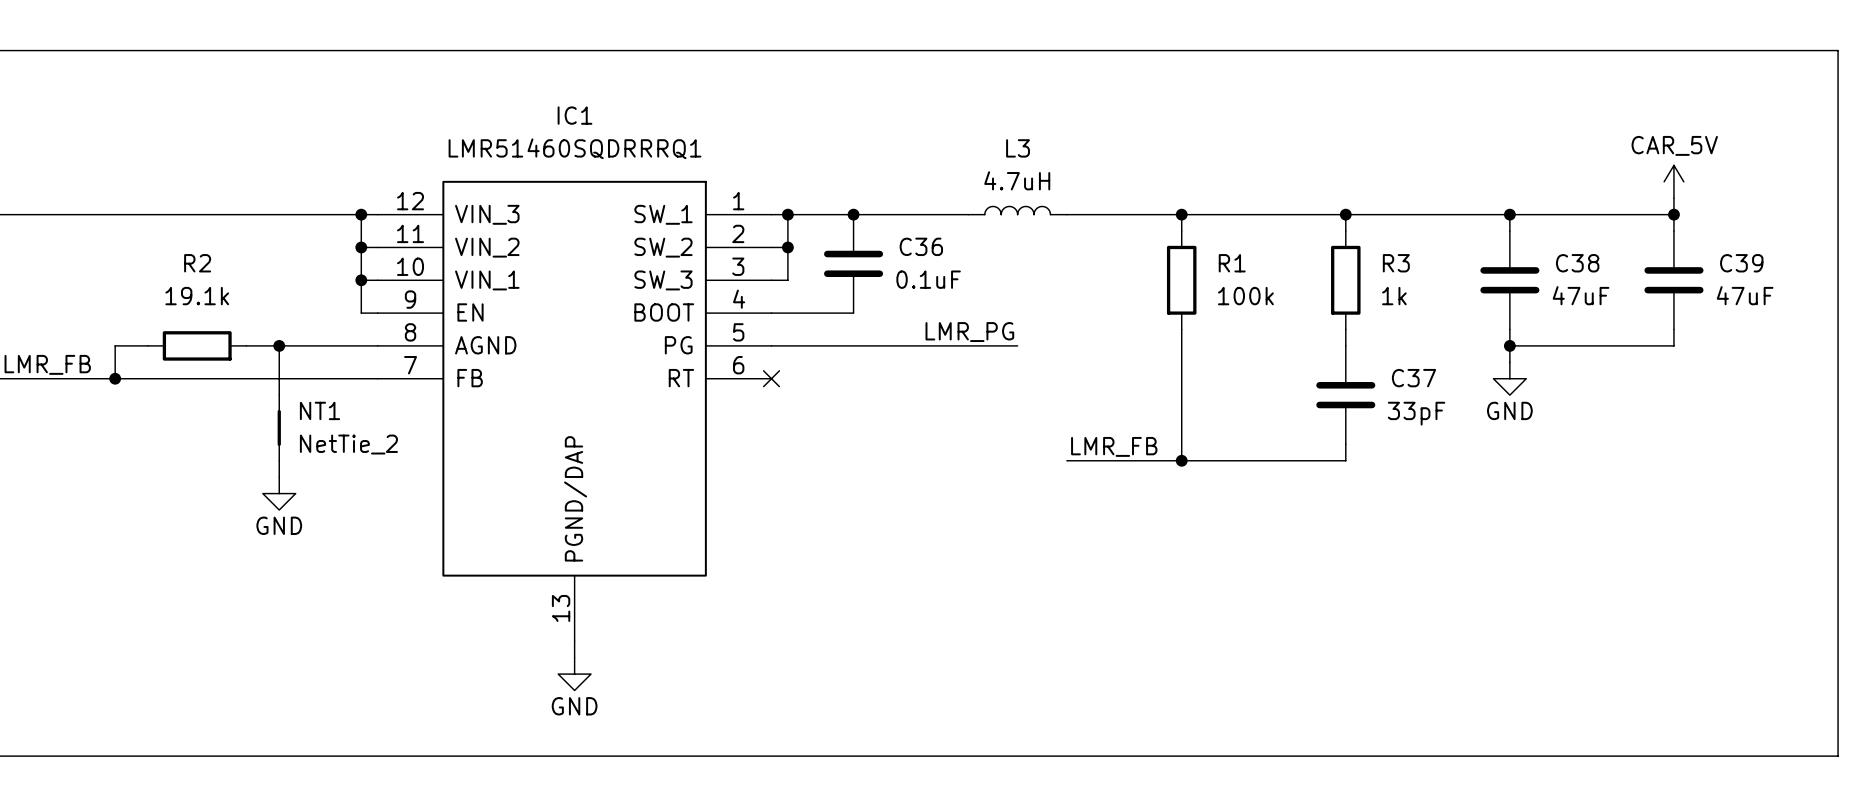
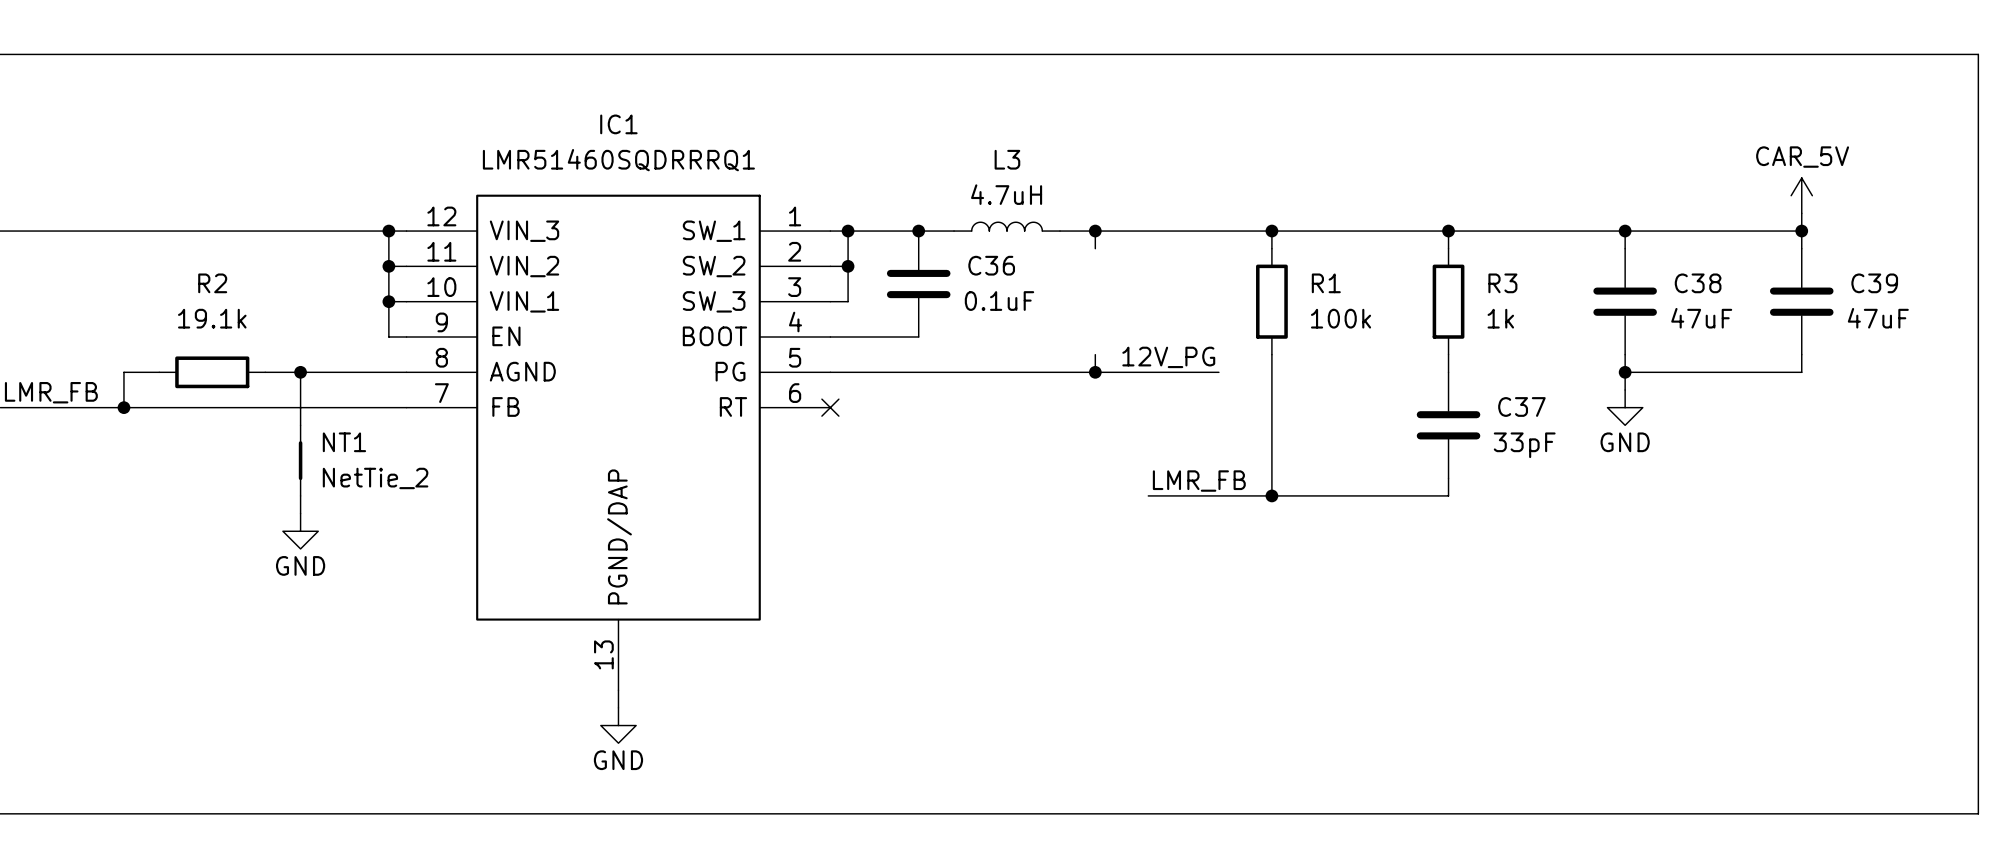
L3 position: (1017, 210) -> (1007, 226)
wire: (886, 214) (968, 214) -> (1059, 231) (1148, 231)
wire: none -> (1095, 231) (1095, 248)
junction: none -> (1095, 231)
wire: none -> (1095, 354) (1095, 372) (1218, 372)
label: LMR_PG (969, 332) -> none
label: none -> 12V_PG (1168, 357)
junction: none -> (1095, 372)

